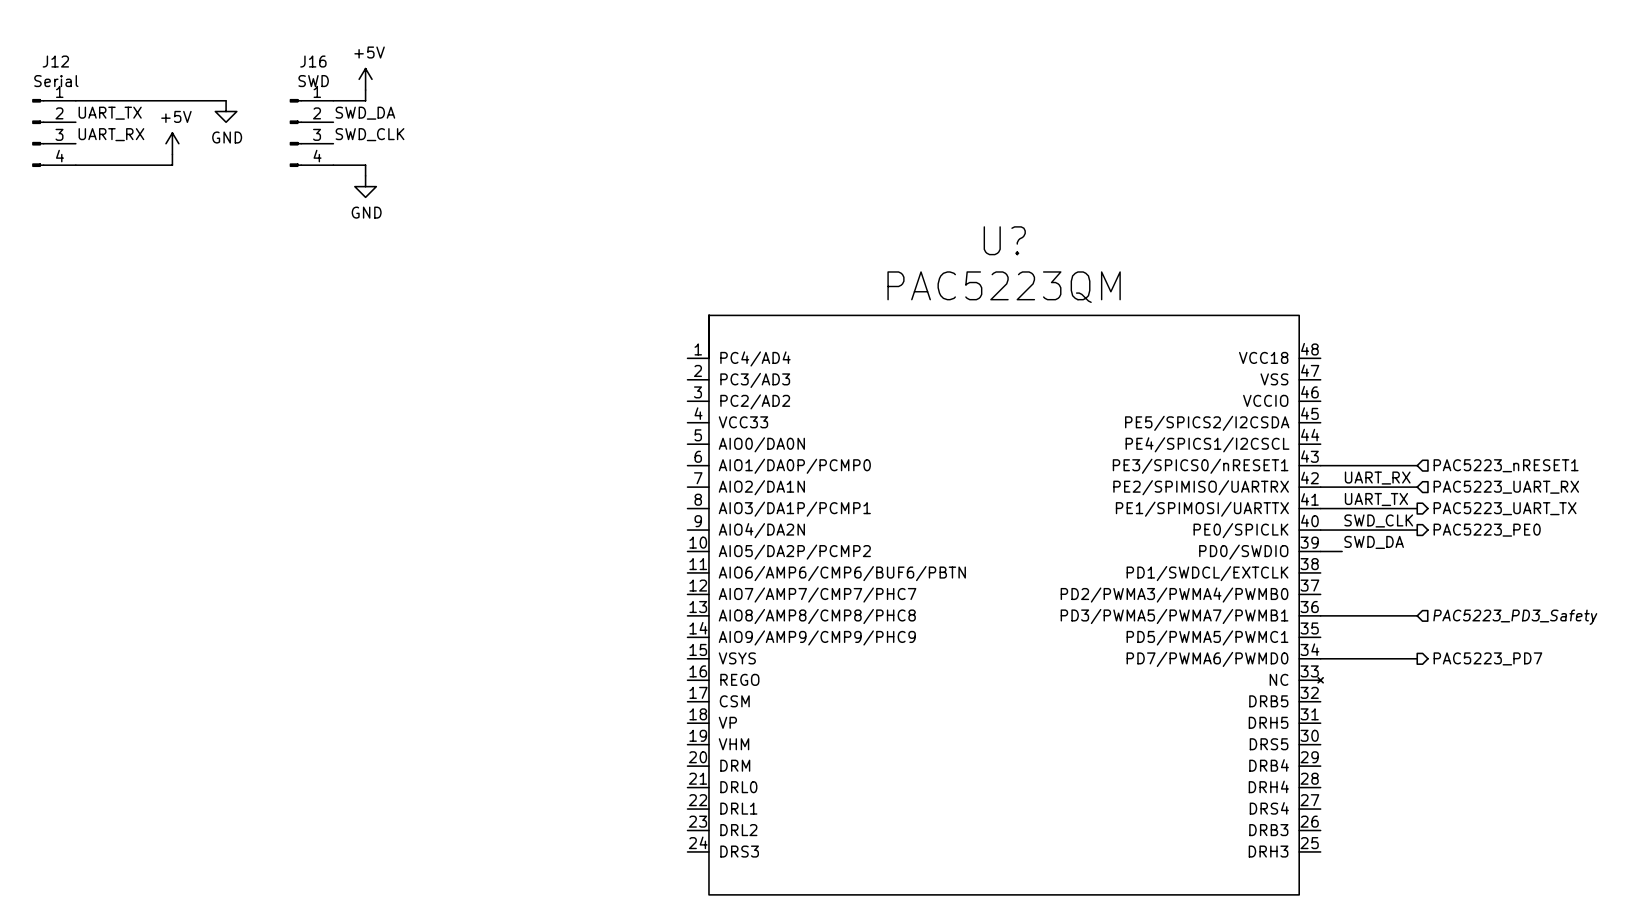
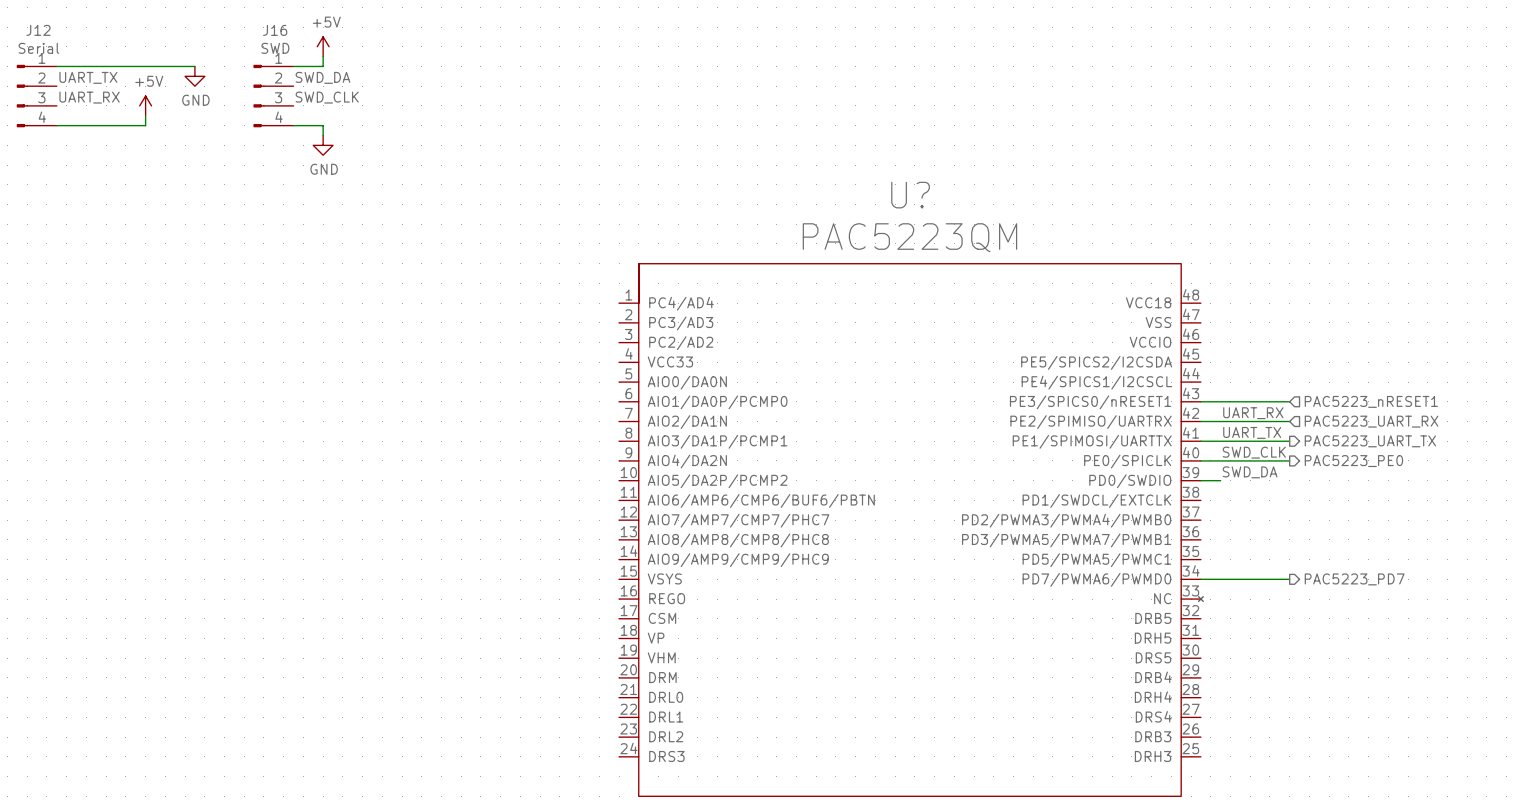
wire: (1320, 615) (1417, 615) -> none
hierarchical label: PAC5223_PD3_Safety (1515, 617) -> none

